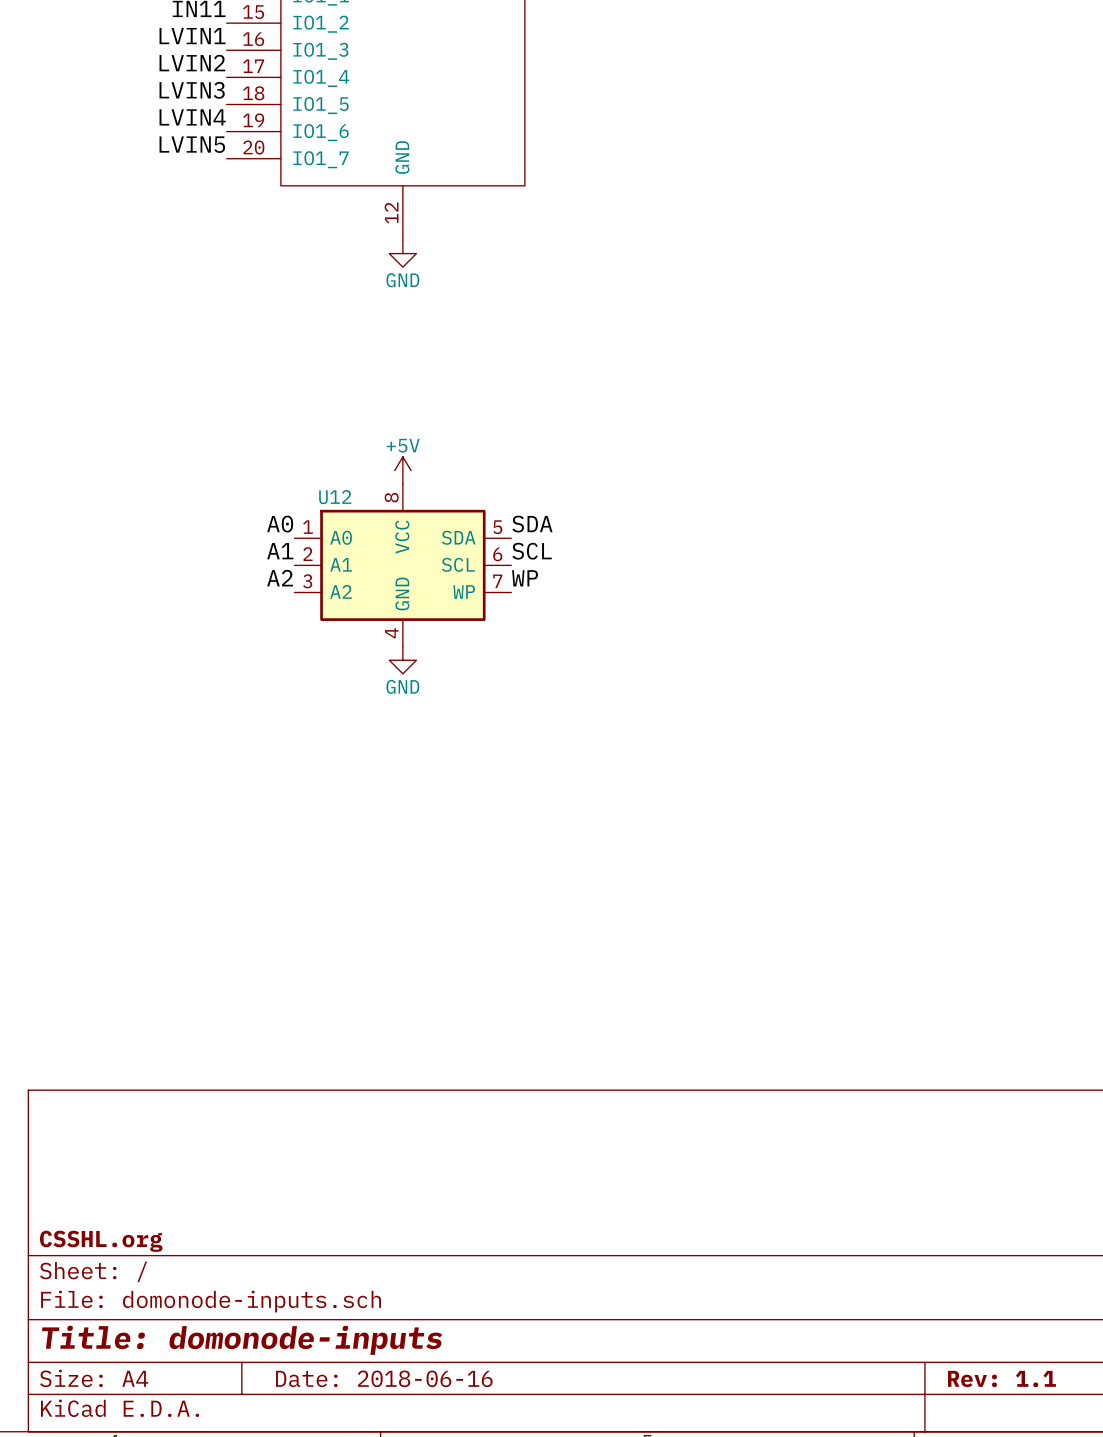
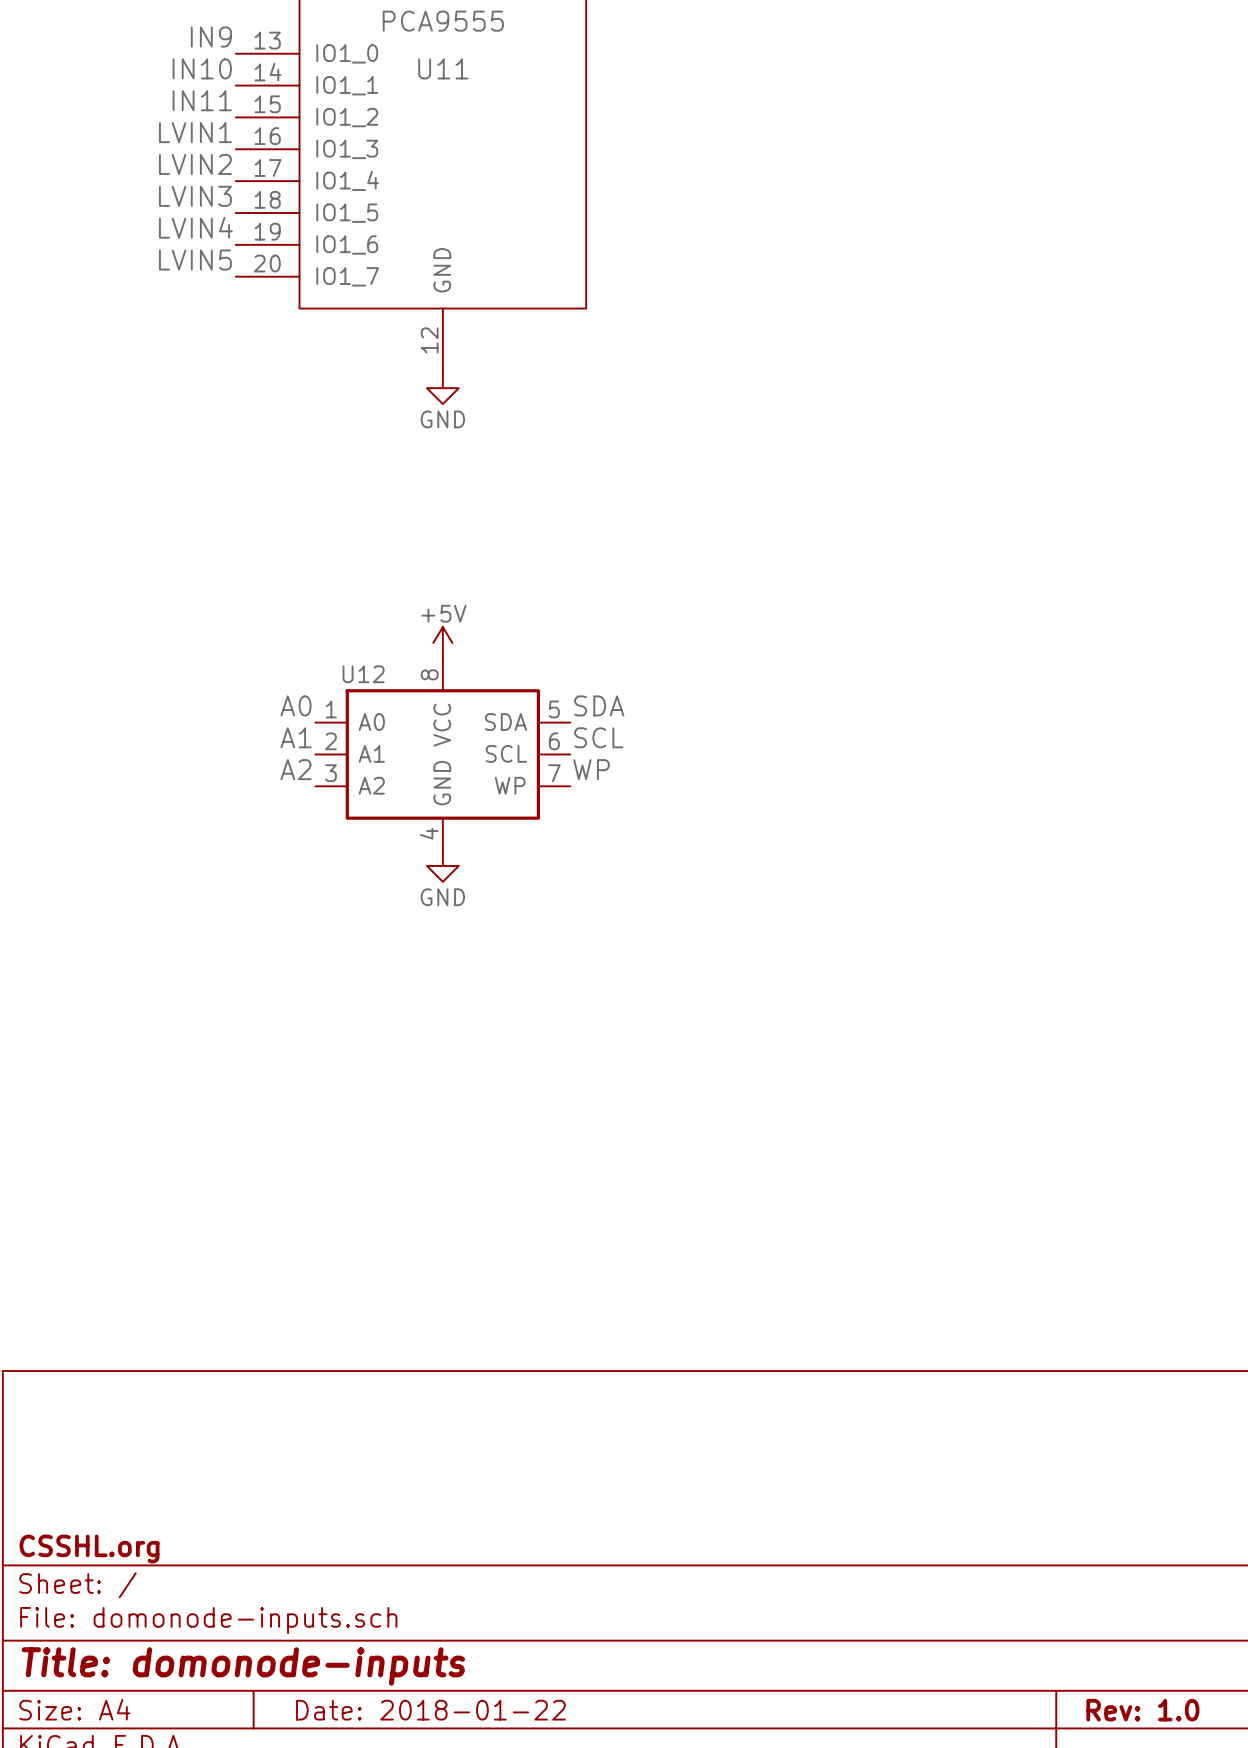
title block: Date: 2018-06-16 (384, 1378) -> Date: 2018-01-22 (430, 1710)
title block: Rev: 1.1 (1001, 1378) -> Rev: 1.0 (1142, 1710)

